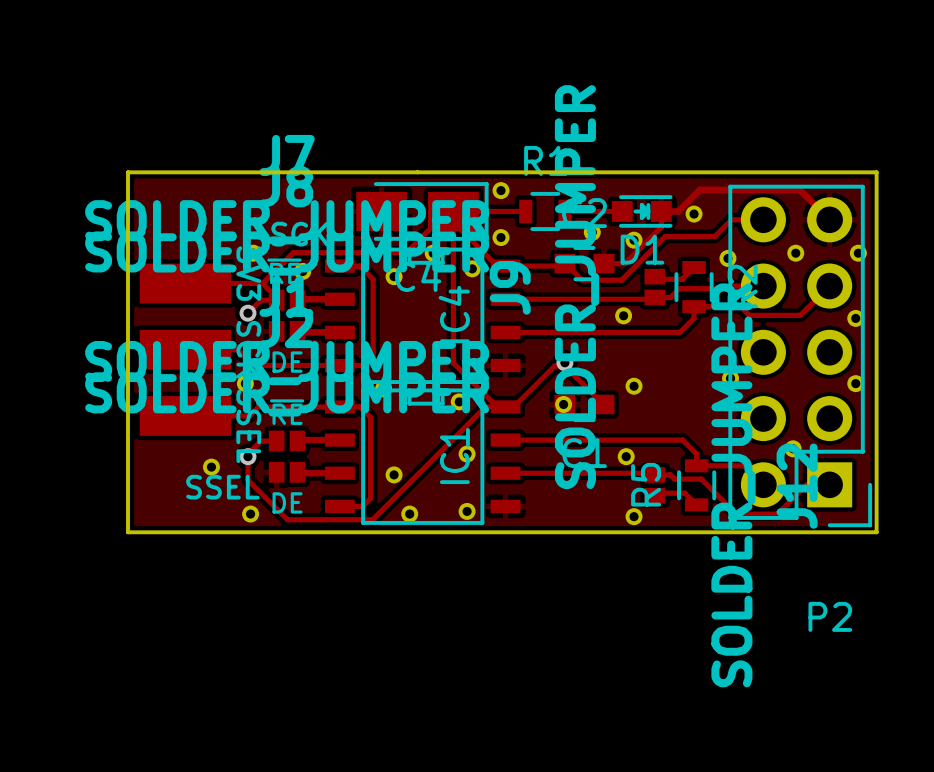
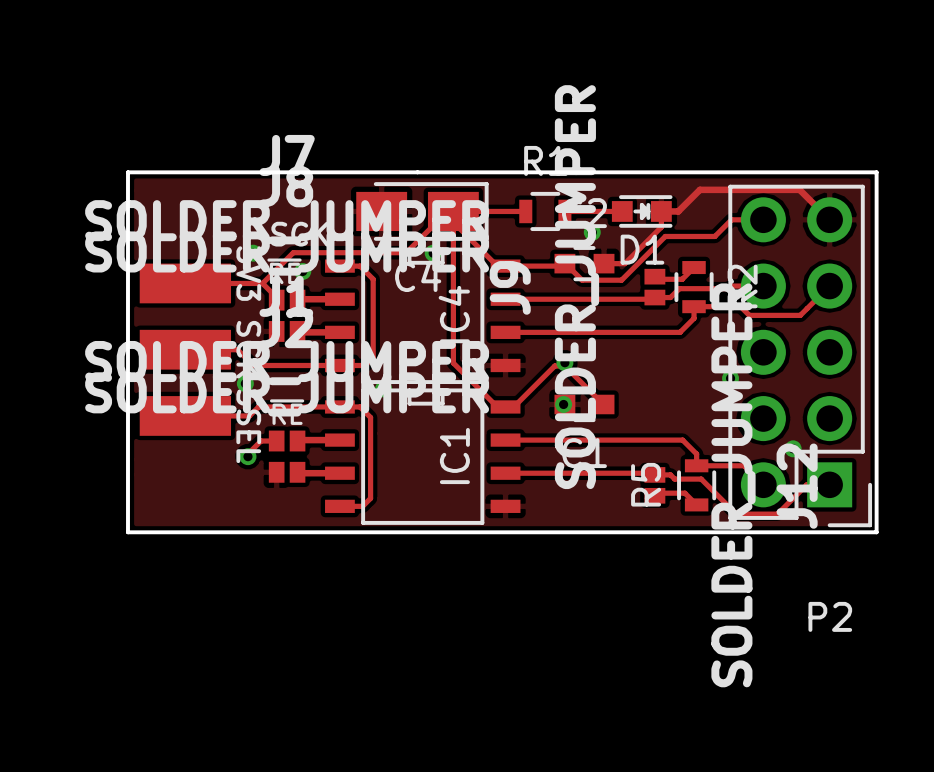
part: (501, 190) -> none
part: (694, 214) -> none
part: (501, 237) -> none
part: (634, 240) -> none
part: (795, 253) -> none
part: (858, 253) -> none
part: (727, 258) -> none
part: (472, 268) -> none
part: (394, 276) -> none
track: (276, 300) (261, 300) (247, 313) -> none
via: (247, 313) -> none
part: (623, 315) -> none
part: (855, 318) -> none
text: DE (287, 362) -> none
part: (855, 383) -> none
part: (634, 386) -> none
part: (459, 401) -> none
track: (497, 406) (485, 406) (372, 519) (287, 519) (247, 480) (247, 456) -> none
part: (467, 454) -> none
part: (626, 456) -> none
part: (211, 467) -> none
part: (394, 474) -> none
text: SSEL (222, 487) -> none
text: DE (287, 502) -> none
part: (467, 511) -> none
part: (250, 514) -> none
part: (409, 514) -> none
part: (634, 516) -> none

